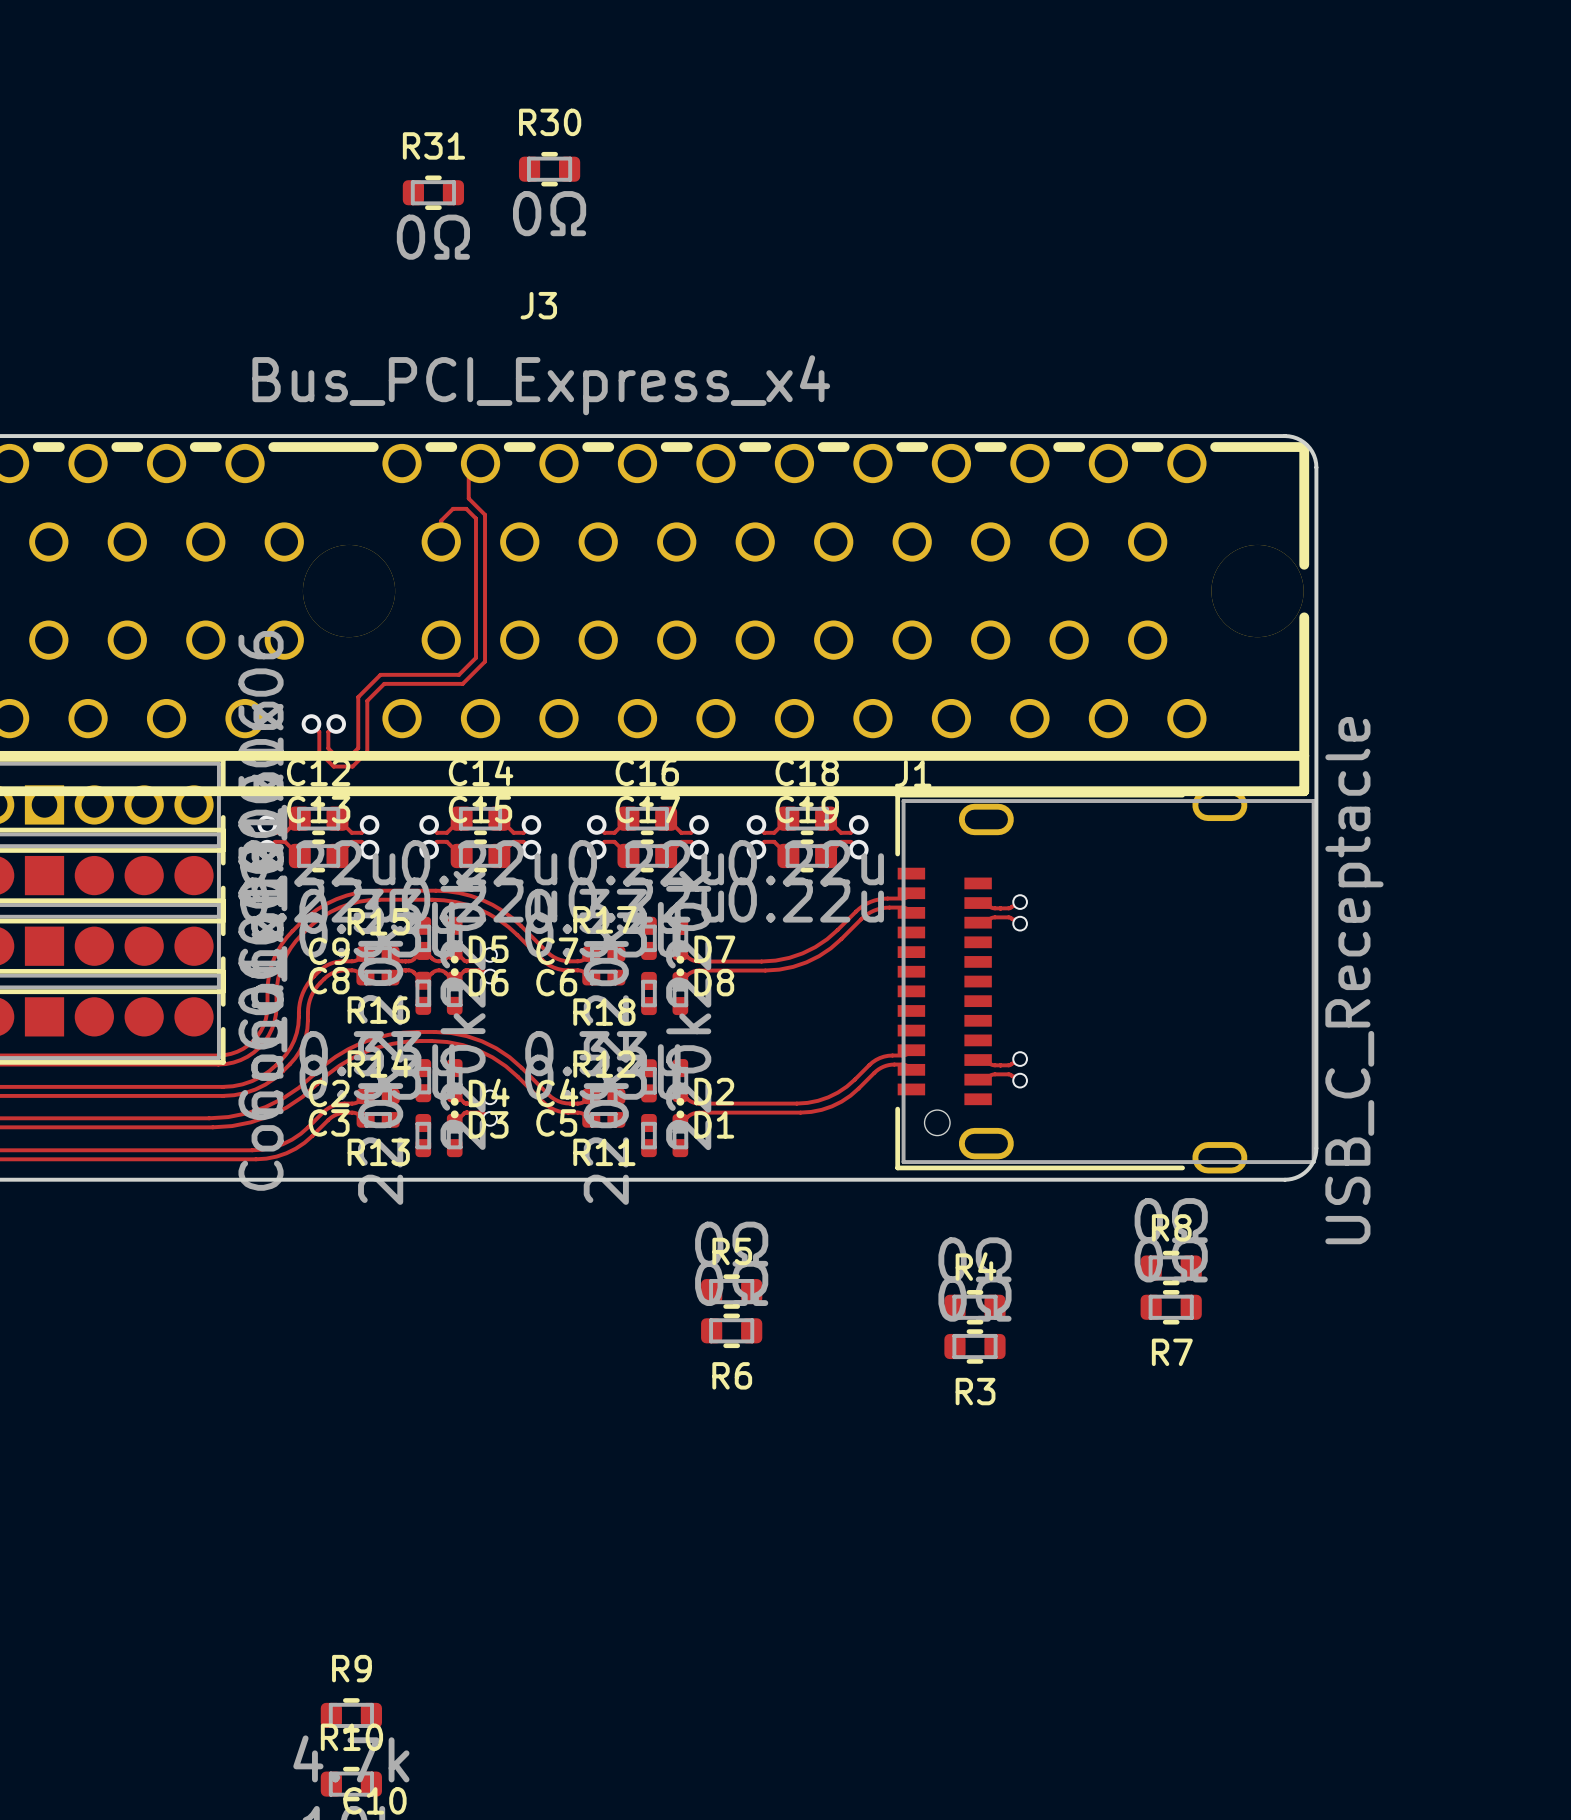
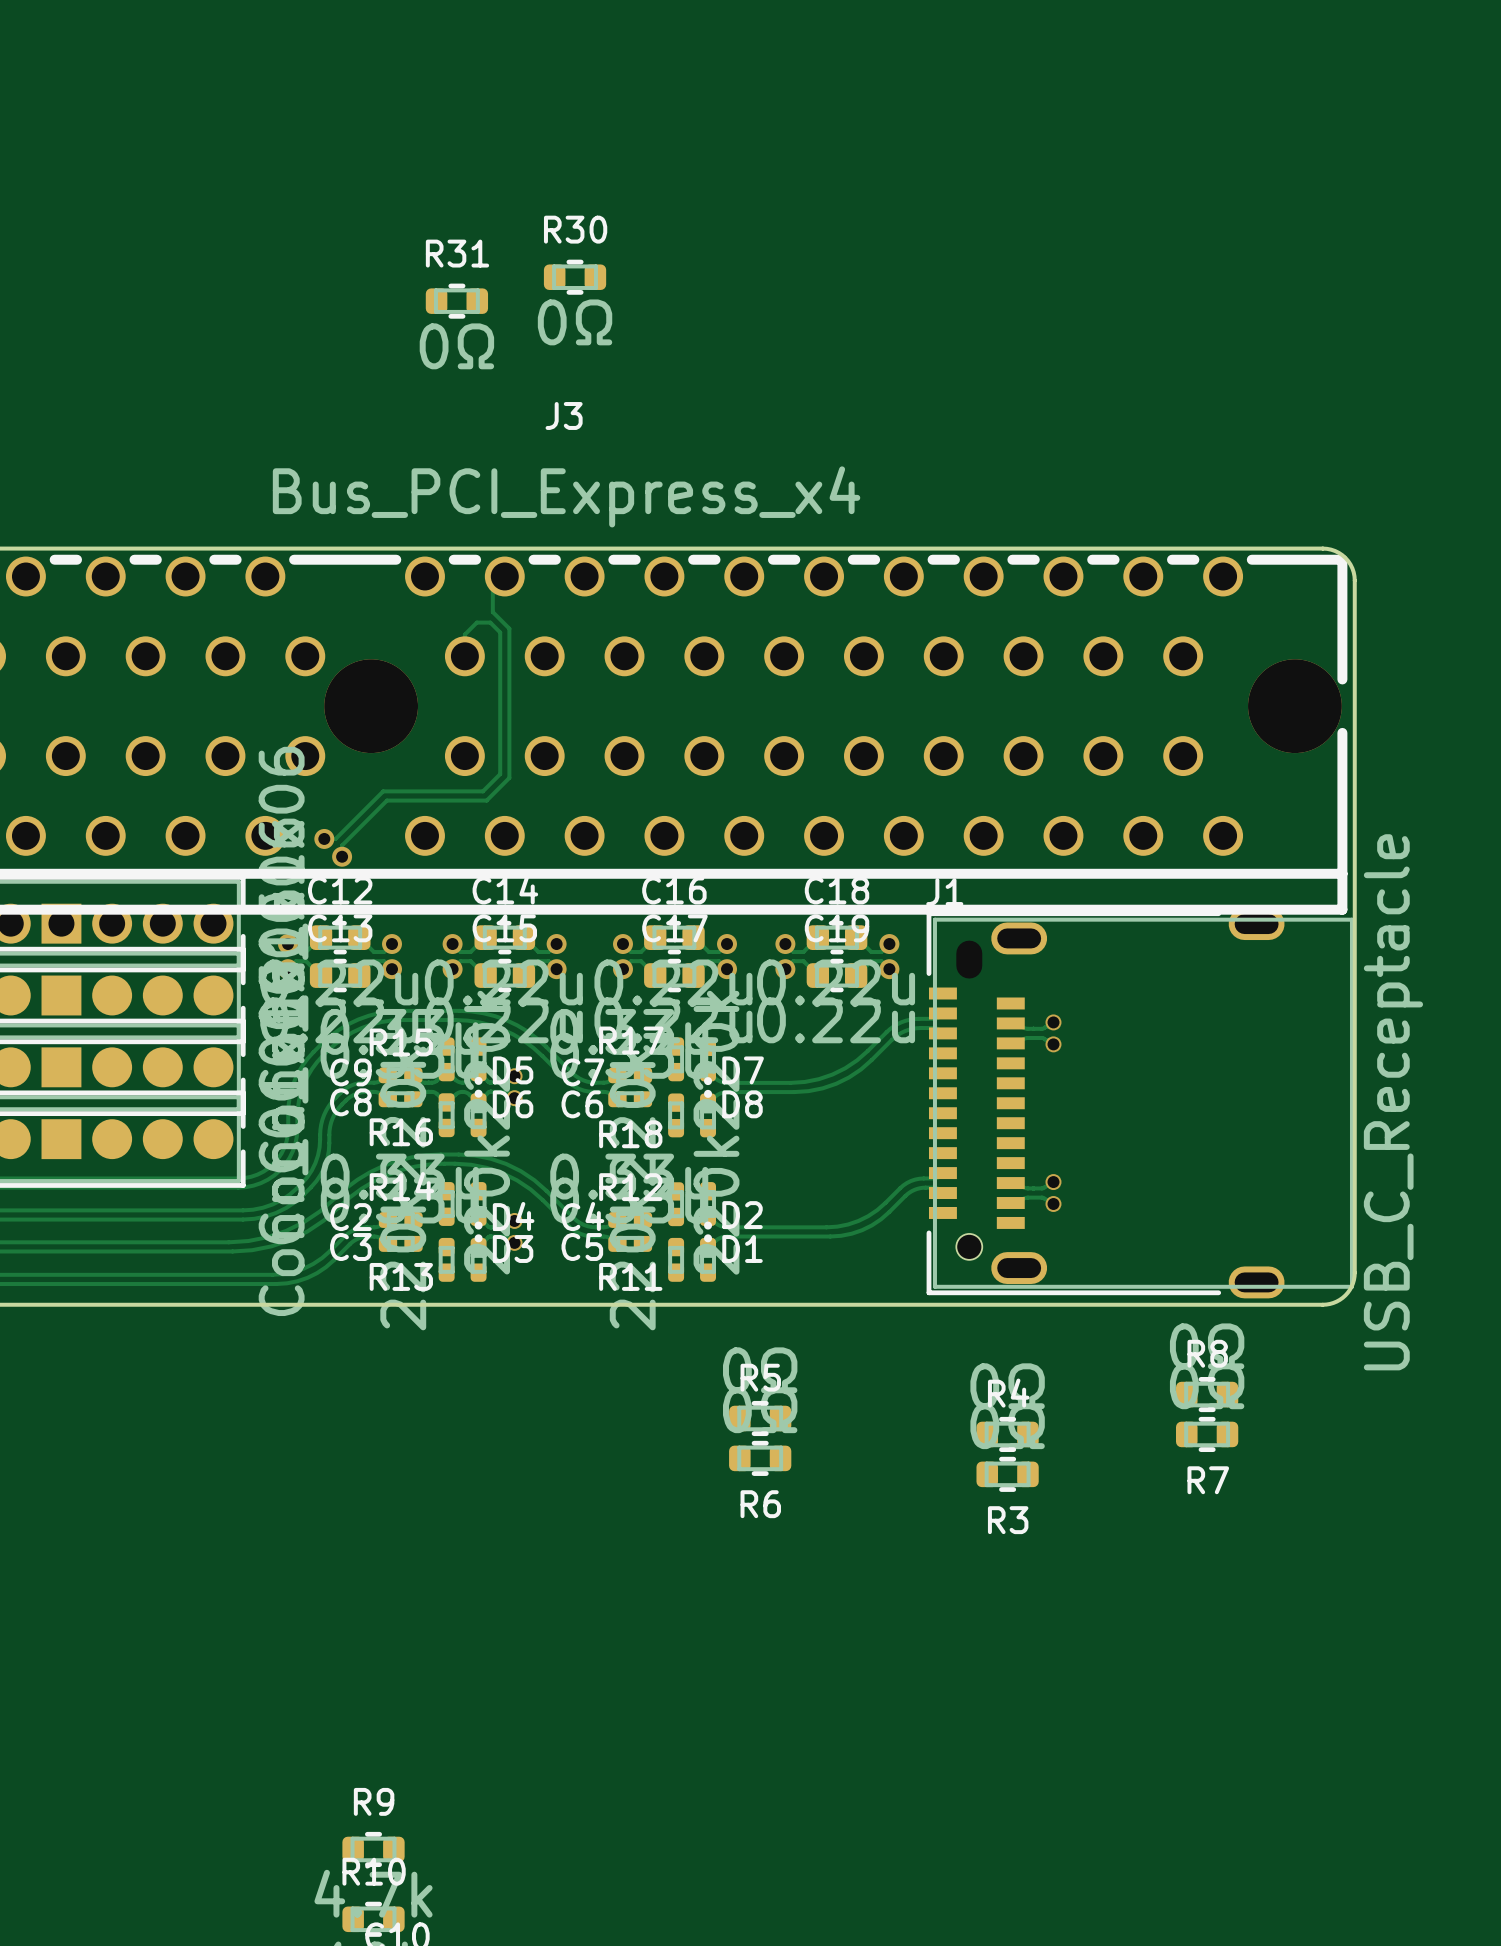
track: (380, 674) (358, 697) (358, 748) (348, 757) (337, 757) (328, 748) (328, 731) (336, 724) -> (403, 791) (383, 791) (335, 838) (324, 838)
track: (384, 683) (367, 700) (367, 751) (352, 766) (333, 766) (319, 752) (319, 731) (311, 724) -> (406, 800) (386, 800) (342, 845) (342, 856)
via: none -> (324, 838)
via: (311, 724) -> none
via: (336, 724) -> none
via: none -> (342, 856)

